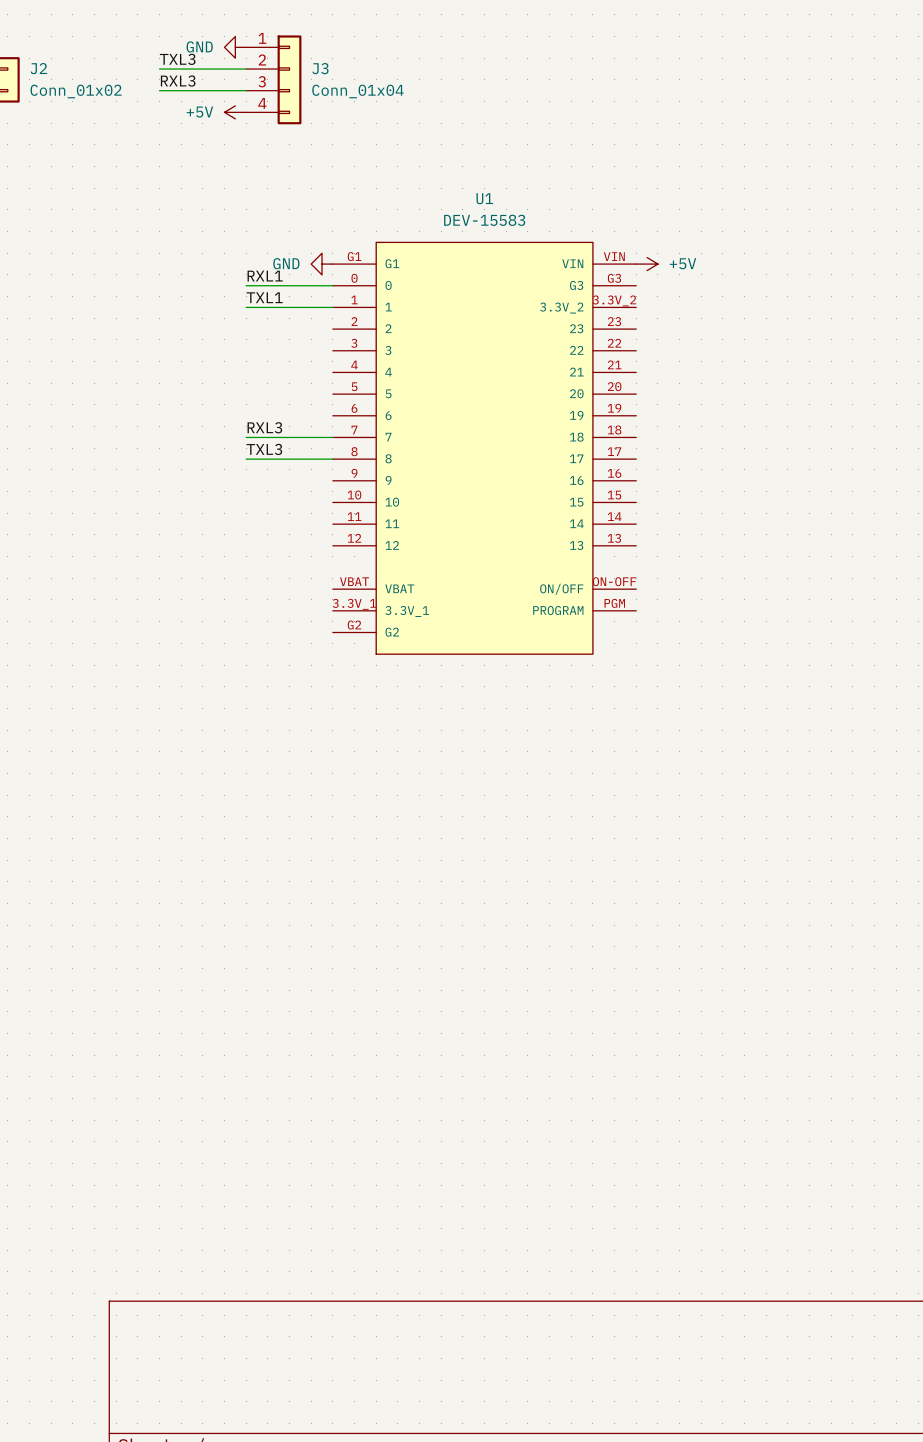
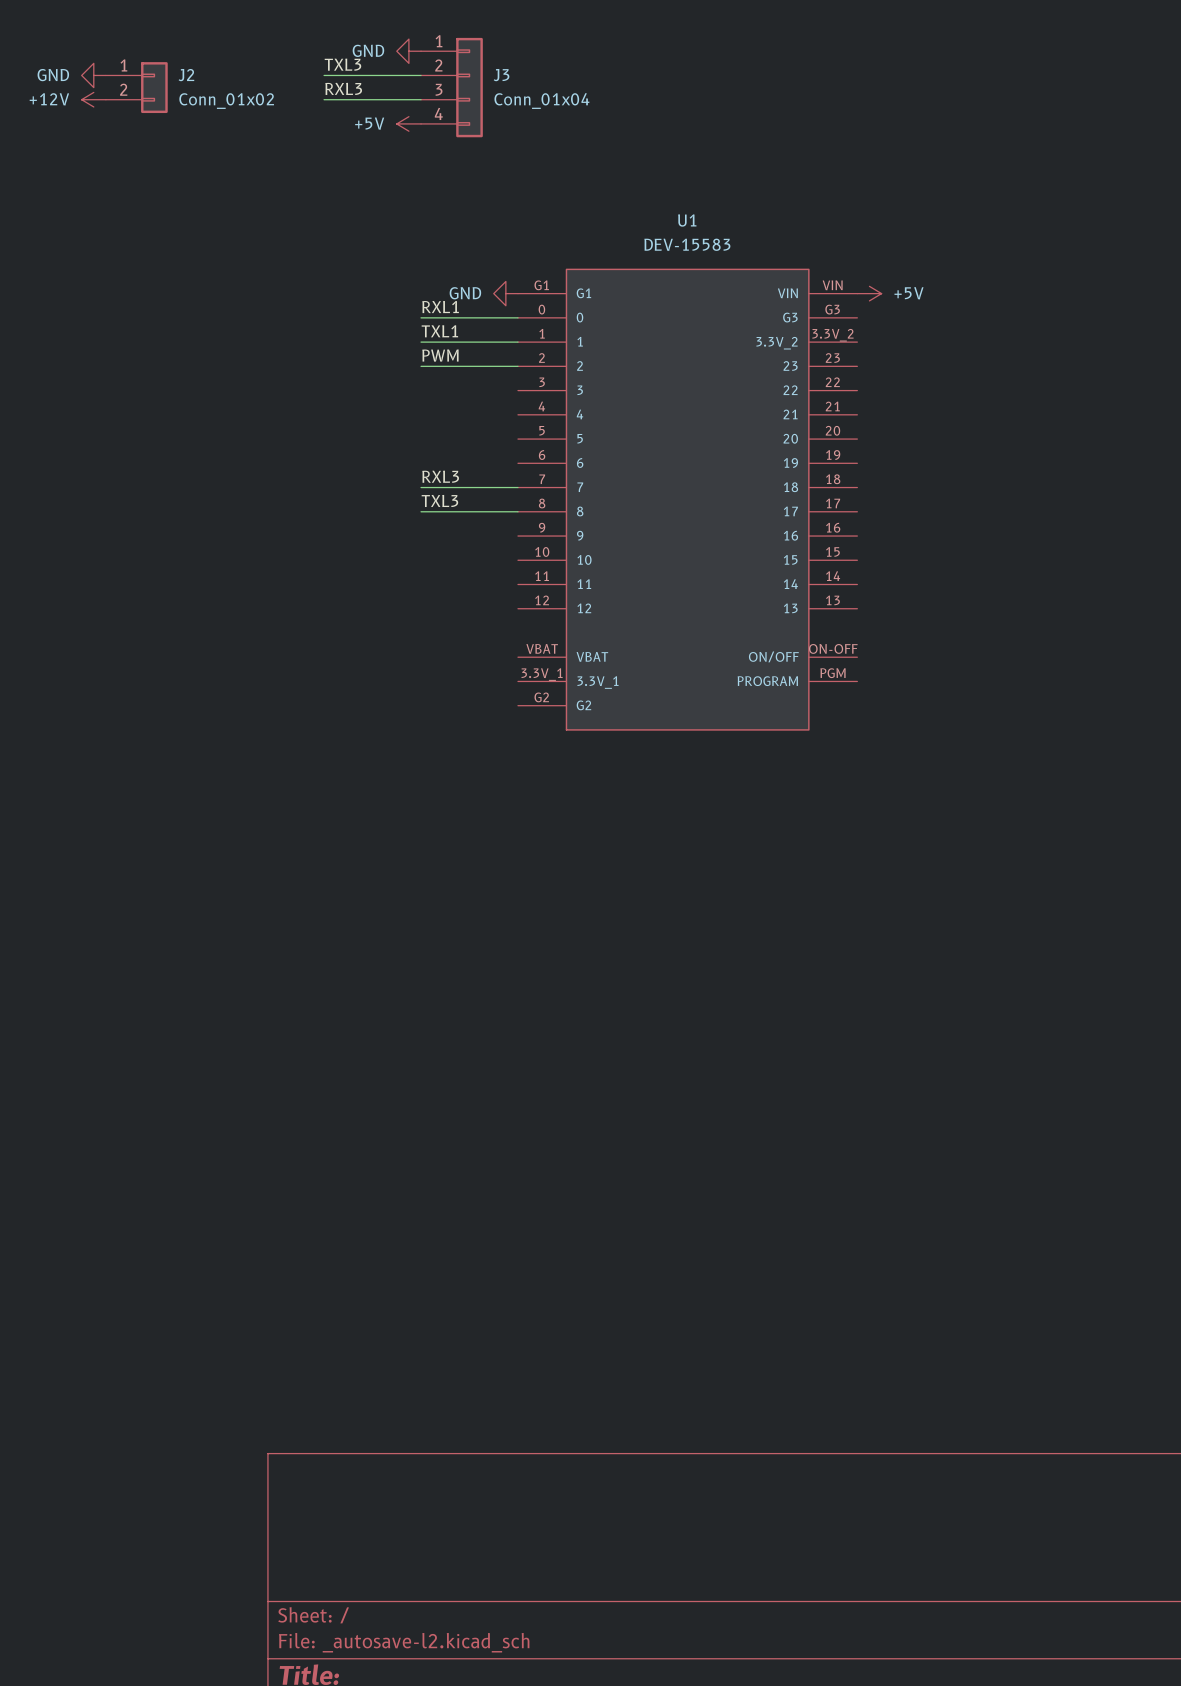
label: none -> PWM (440, 355)
wire: none -> (421, 366) (517, 366)

